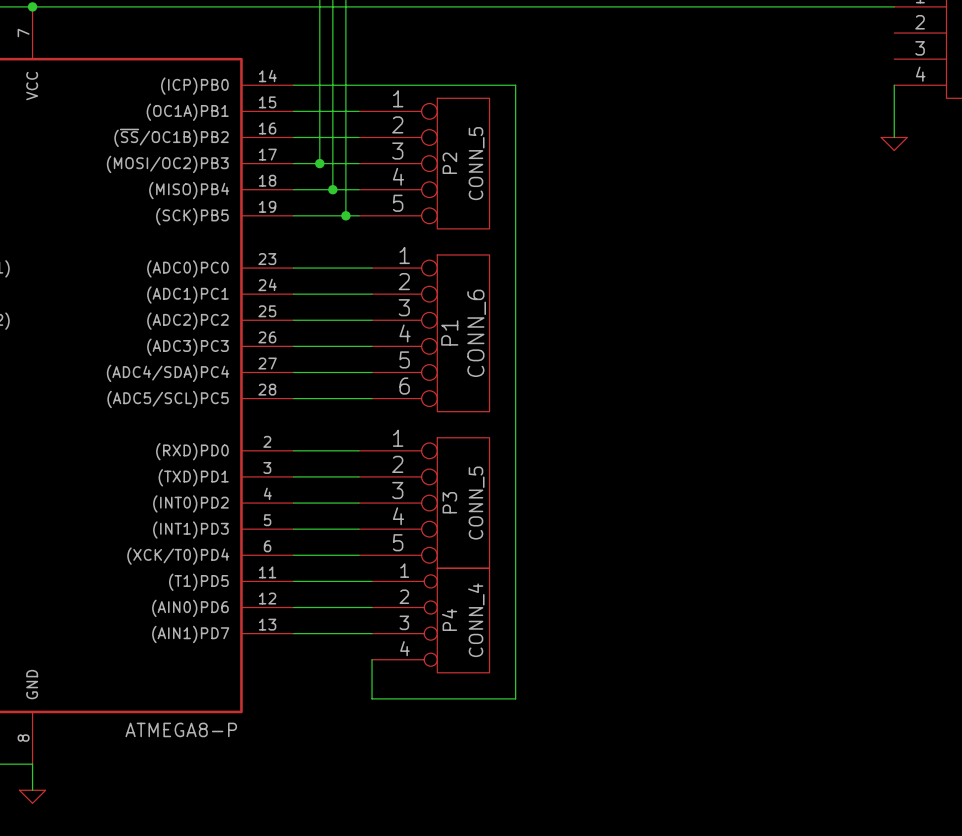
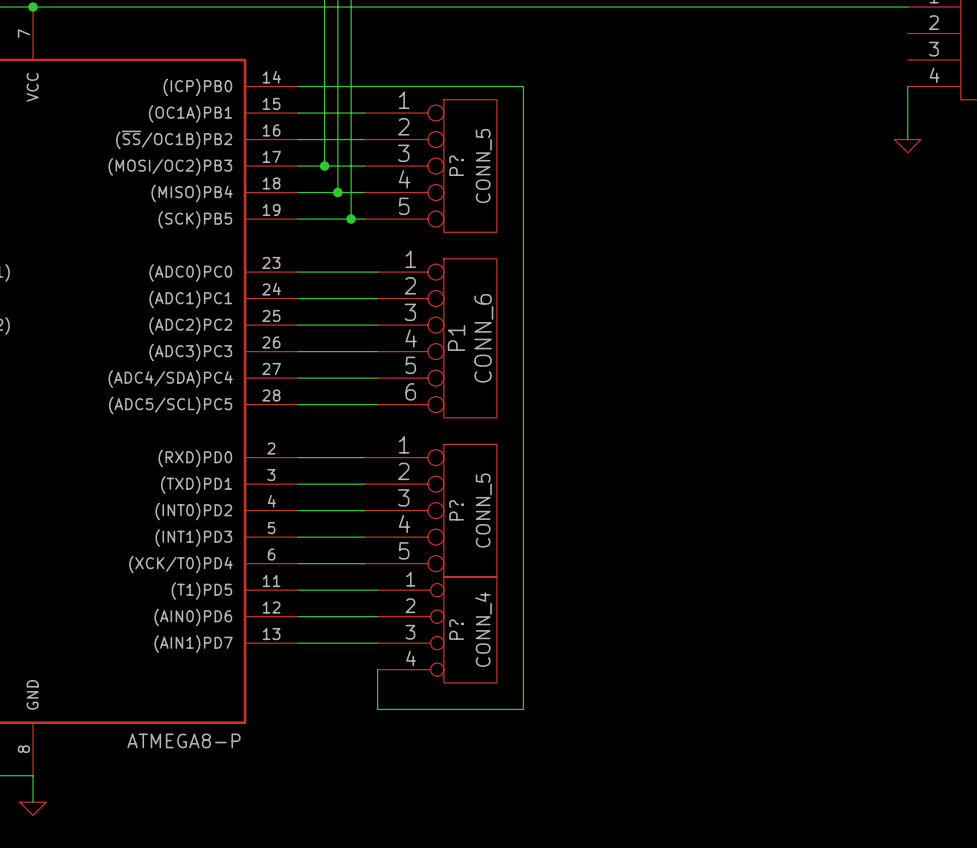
P2 name: P2 (449, 163) -> P? (456, 165)
P3 name: P3 (449, 502) -> P? (456, 510)
P4 name: P4 (449, 619) -> P? (456, 629)

